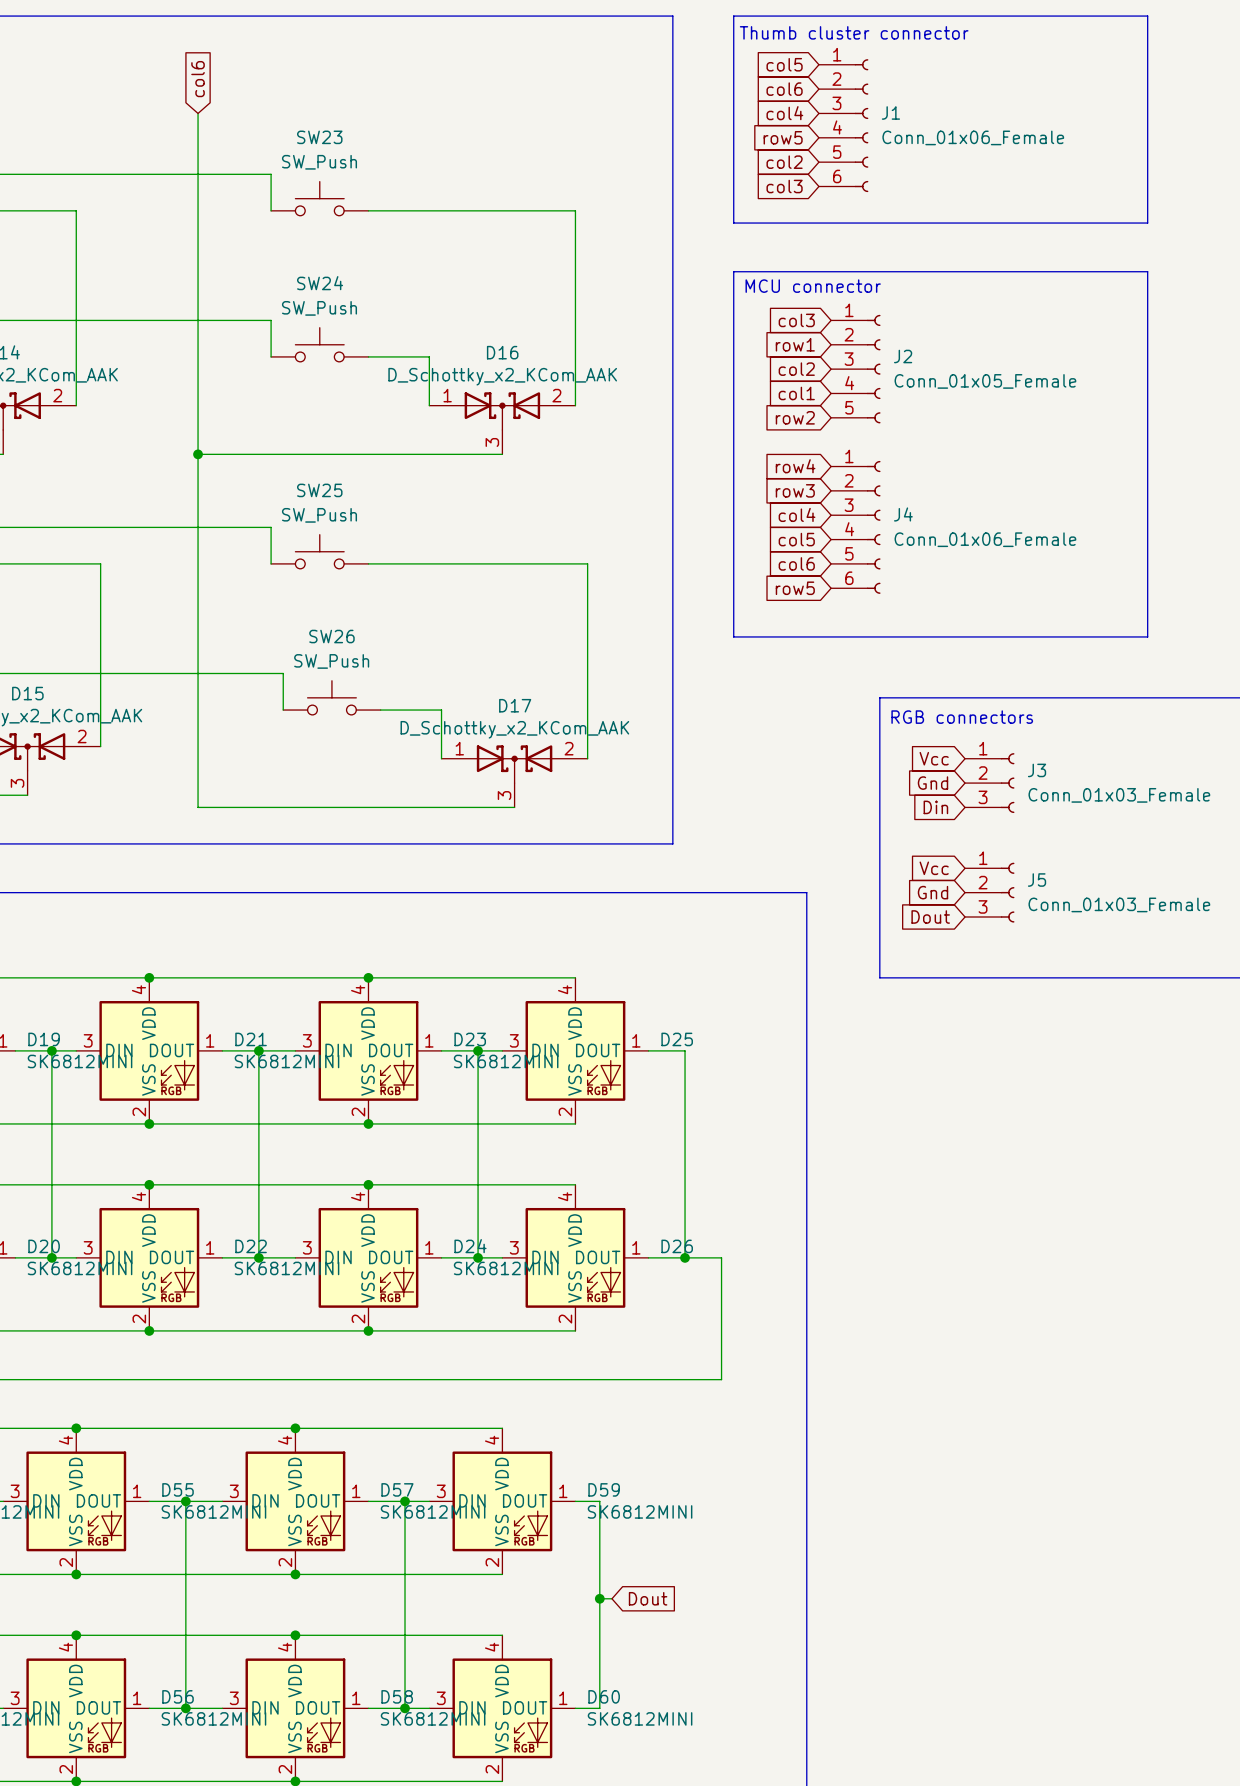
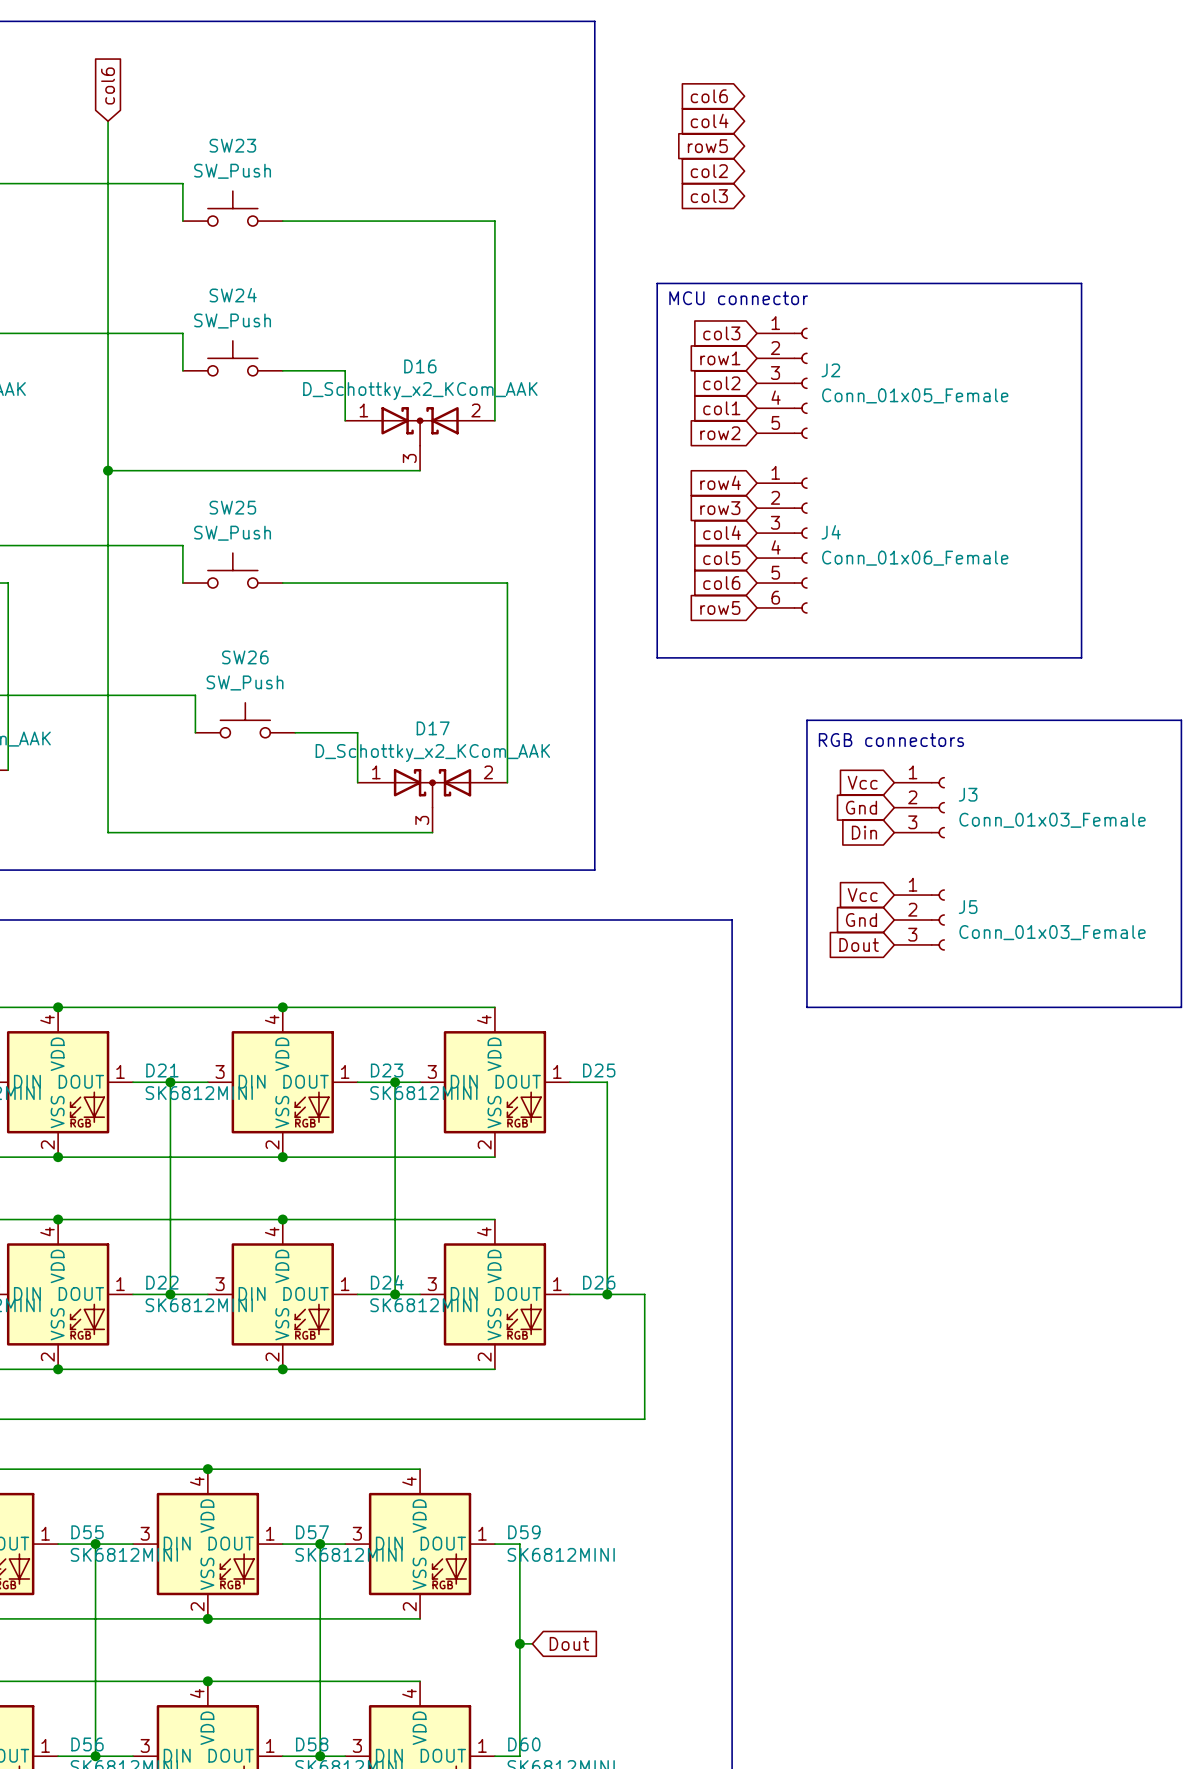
line: (733, 16) (1147, 16) (1147, 223) (733, 223) (733, 16) -> none
text: Thumb cluster connector (854, 32) -> none
global label: col5 (784, 64) -> none
J1: Conn_01x06_Female (843, 125) -> none

